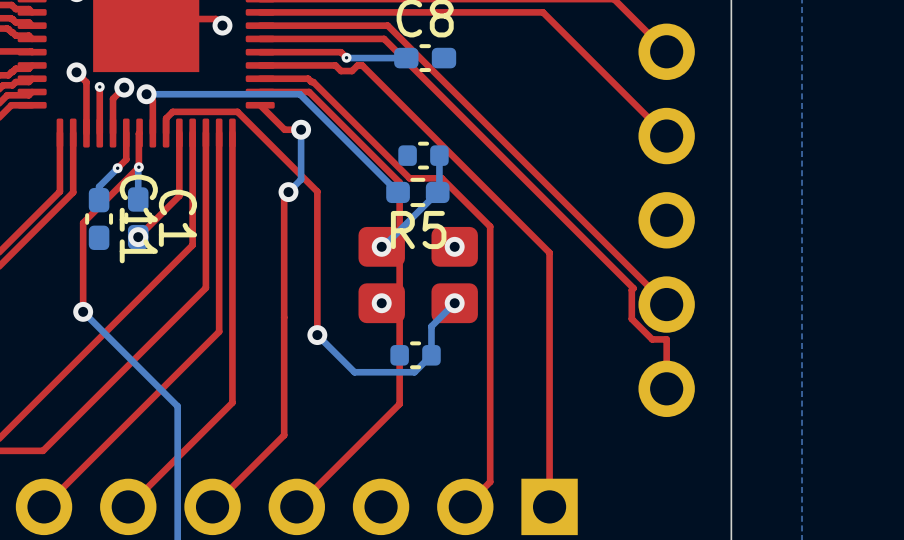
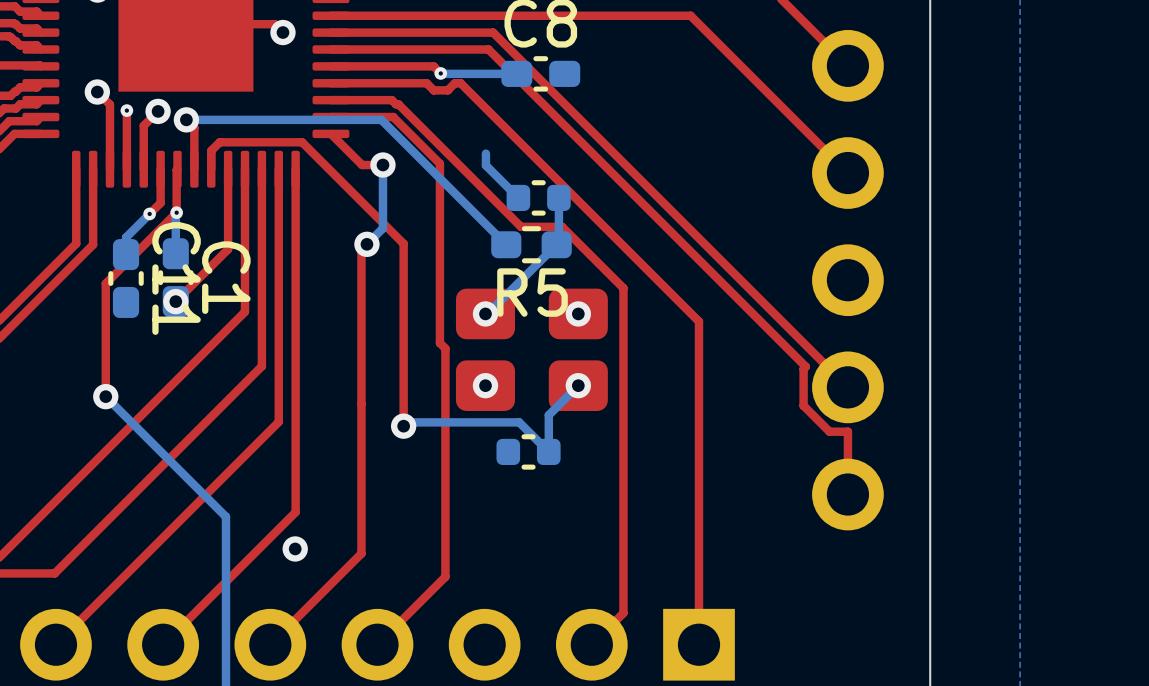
bottom track: none -> (485, 153) (485, 165) (518, 197)
top track: (345, 128) (399, 182) (399, 404) (350, 453) -> (439, 163) (439, 343) (445, 348) (445, 576)
bottom track: (317, 335) (354, 372) (414, 372) (431, 355) -> (403, 426) (407, 422) (519, 422) (548, 451)
via: none -> (295, 548)

